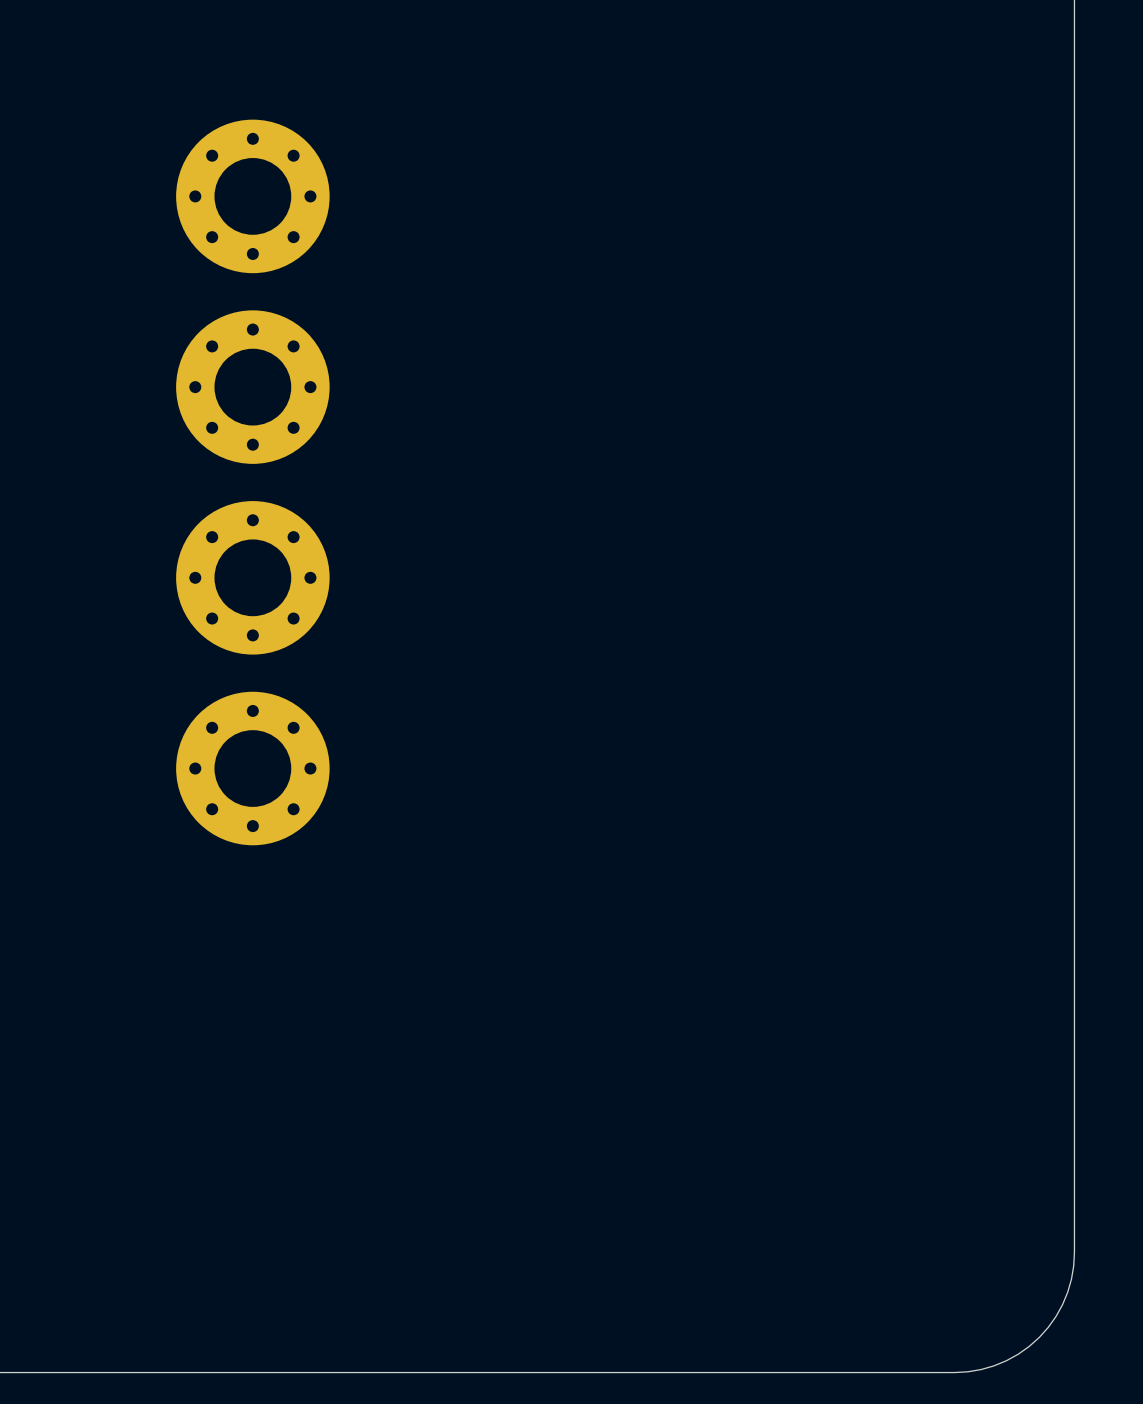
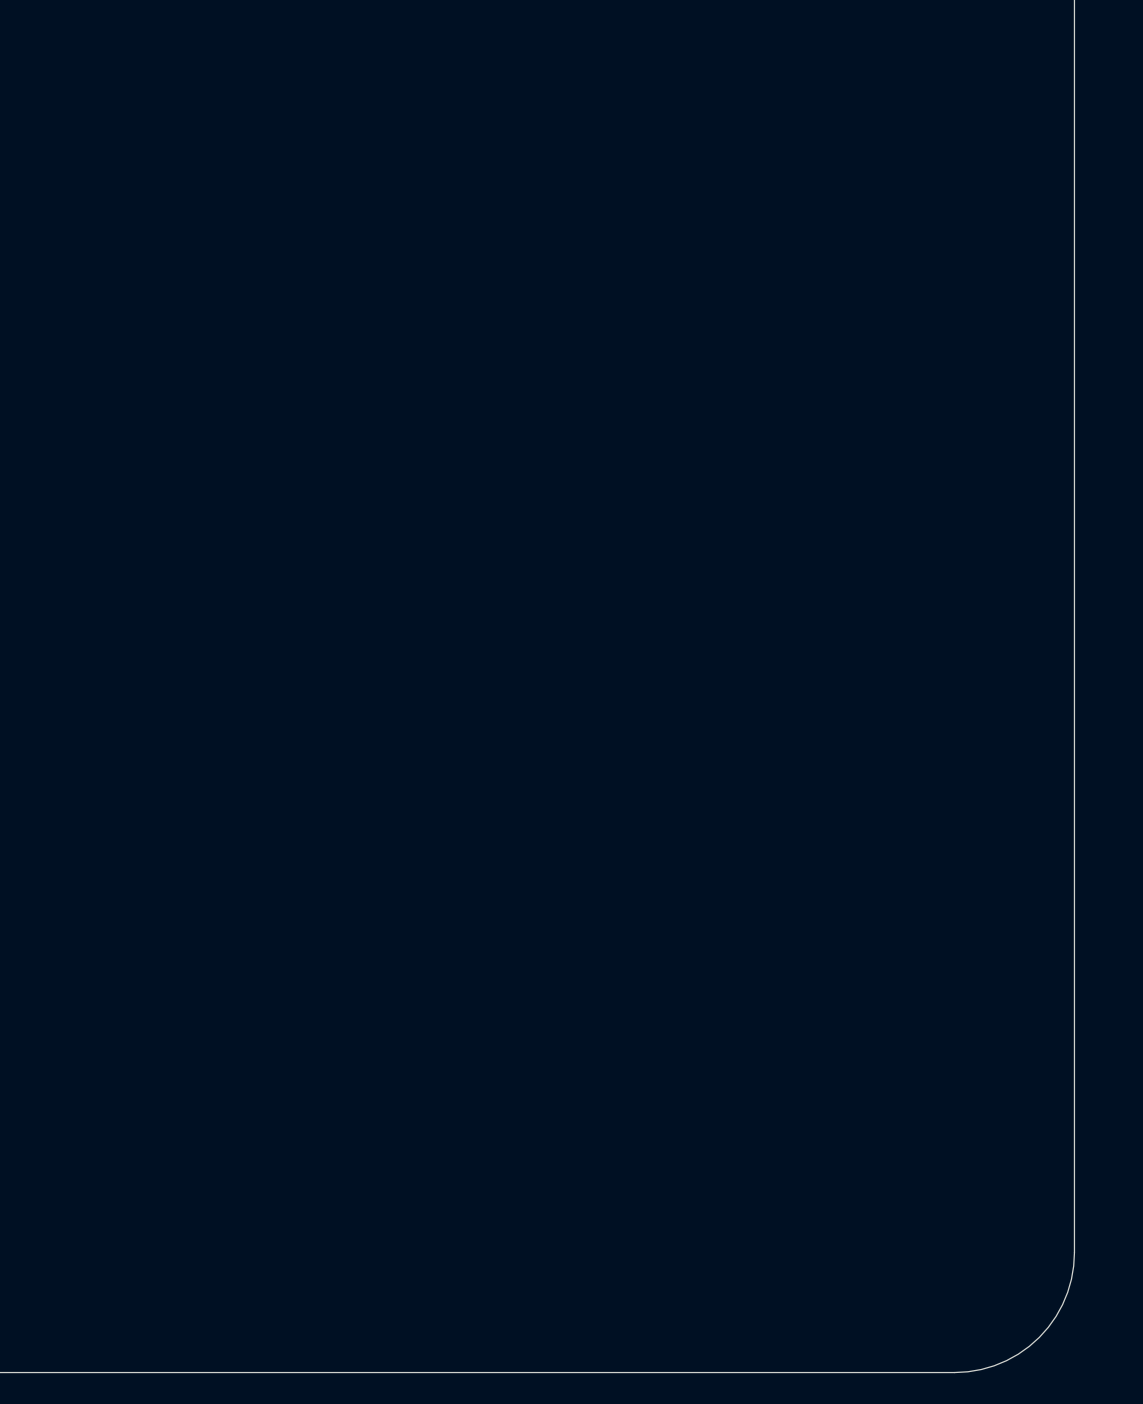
part: (252, 196) -> none
part: (252, 387) -> none
part: (252, 577) -> none
part: (252, 768) -> none

